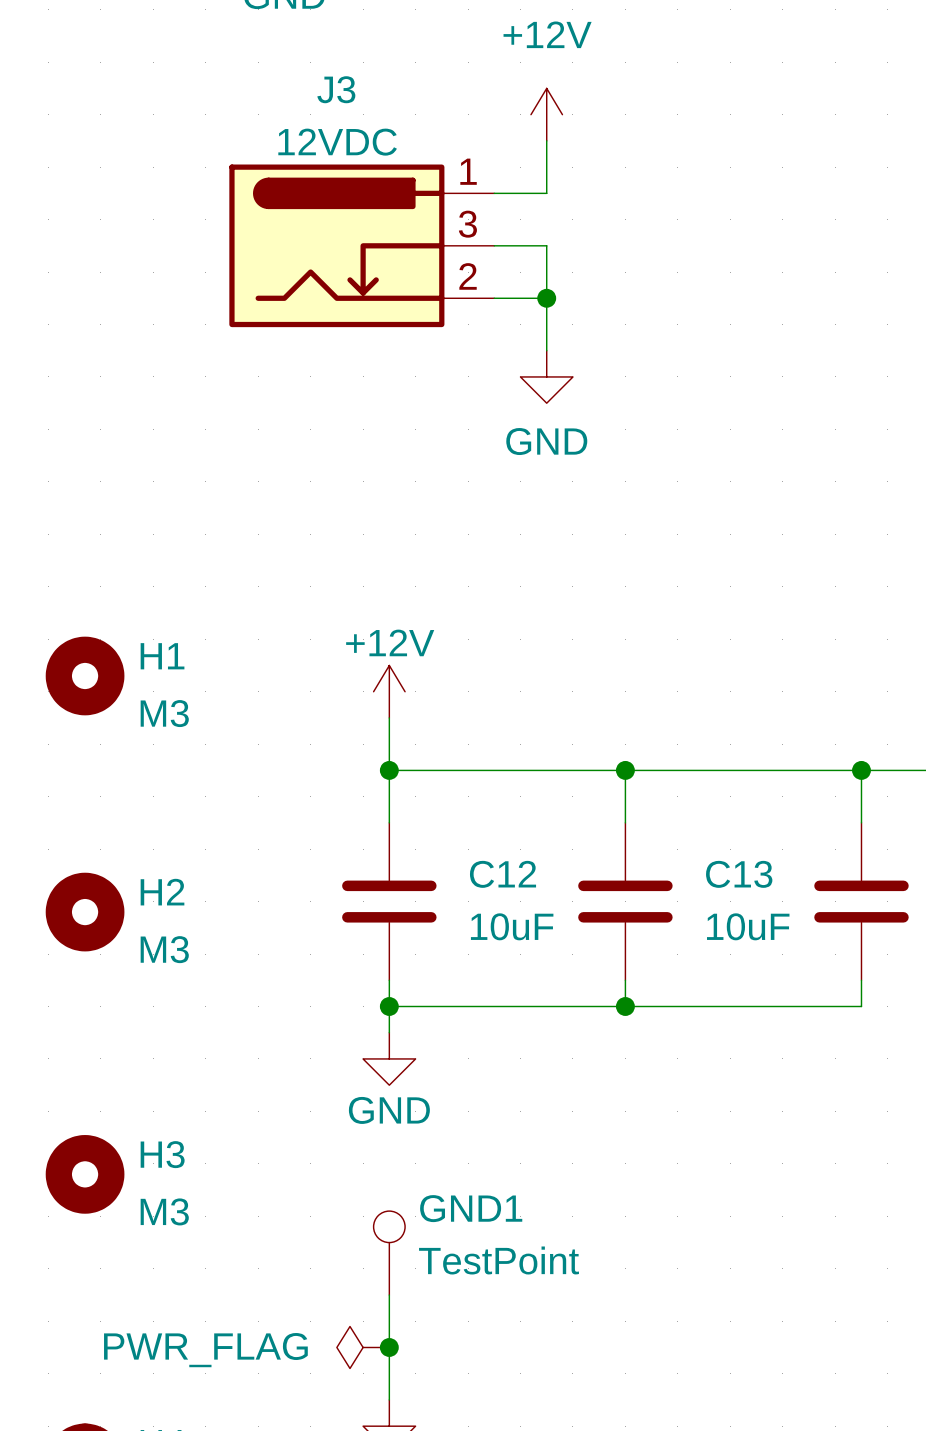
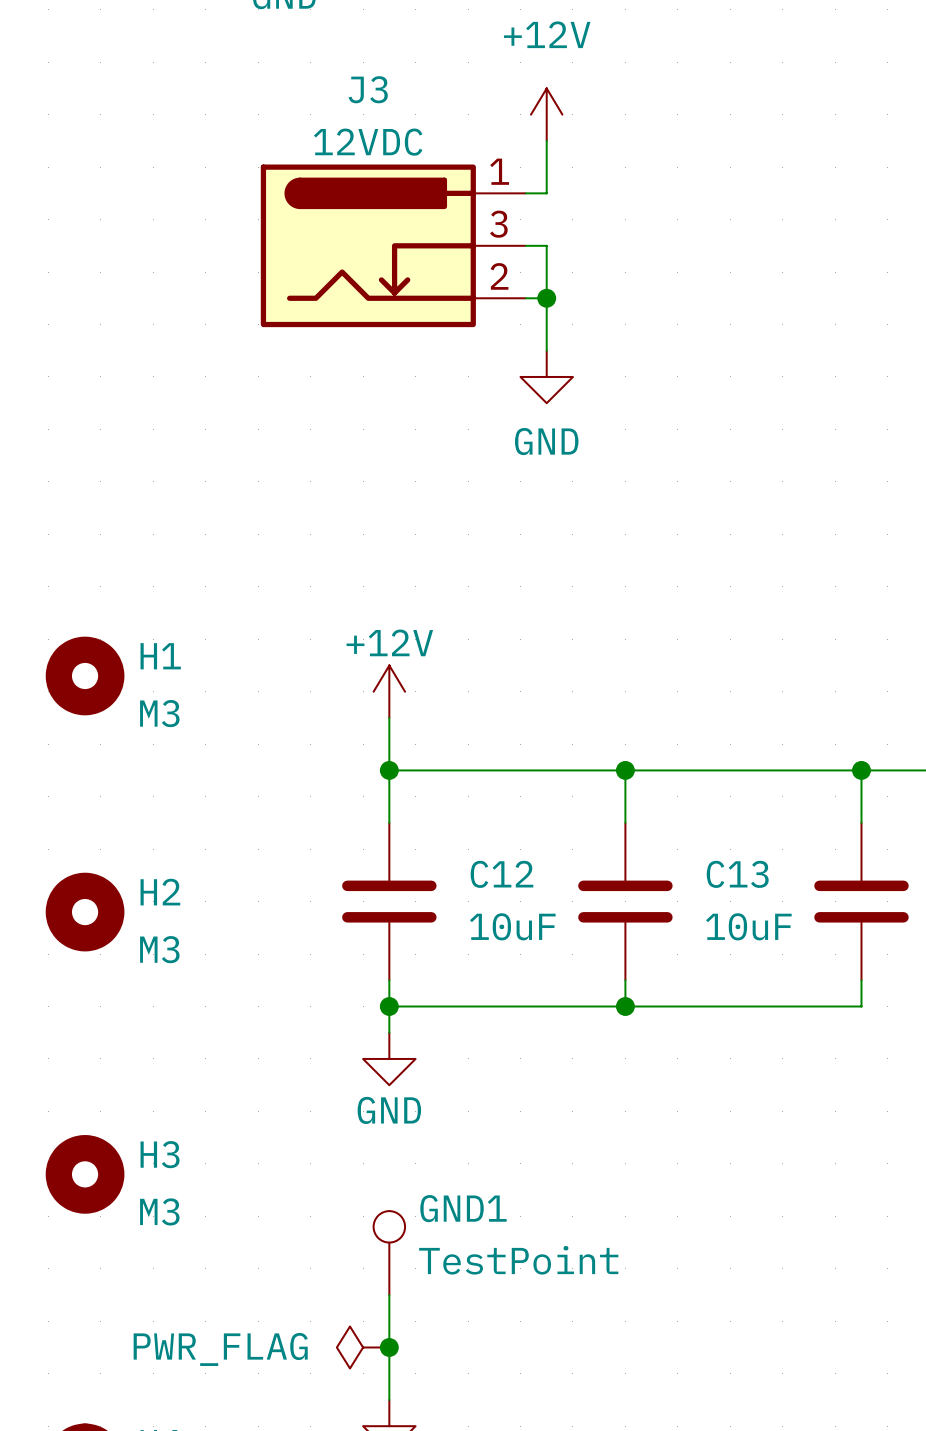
J3 position: (361, 245) -> (393, 245)

